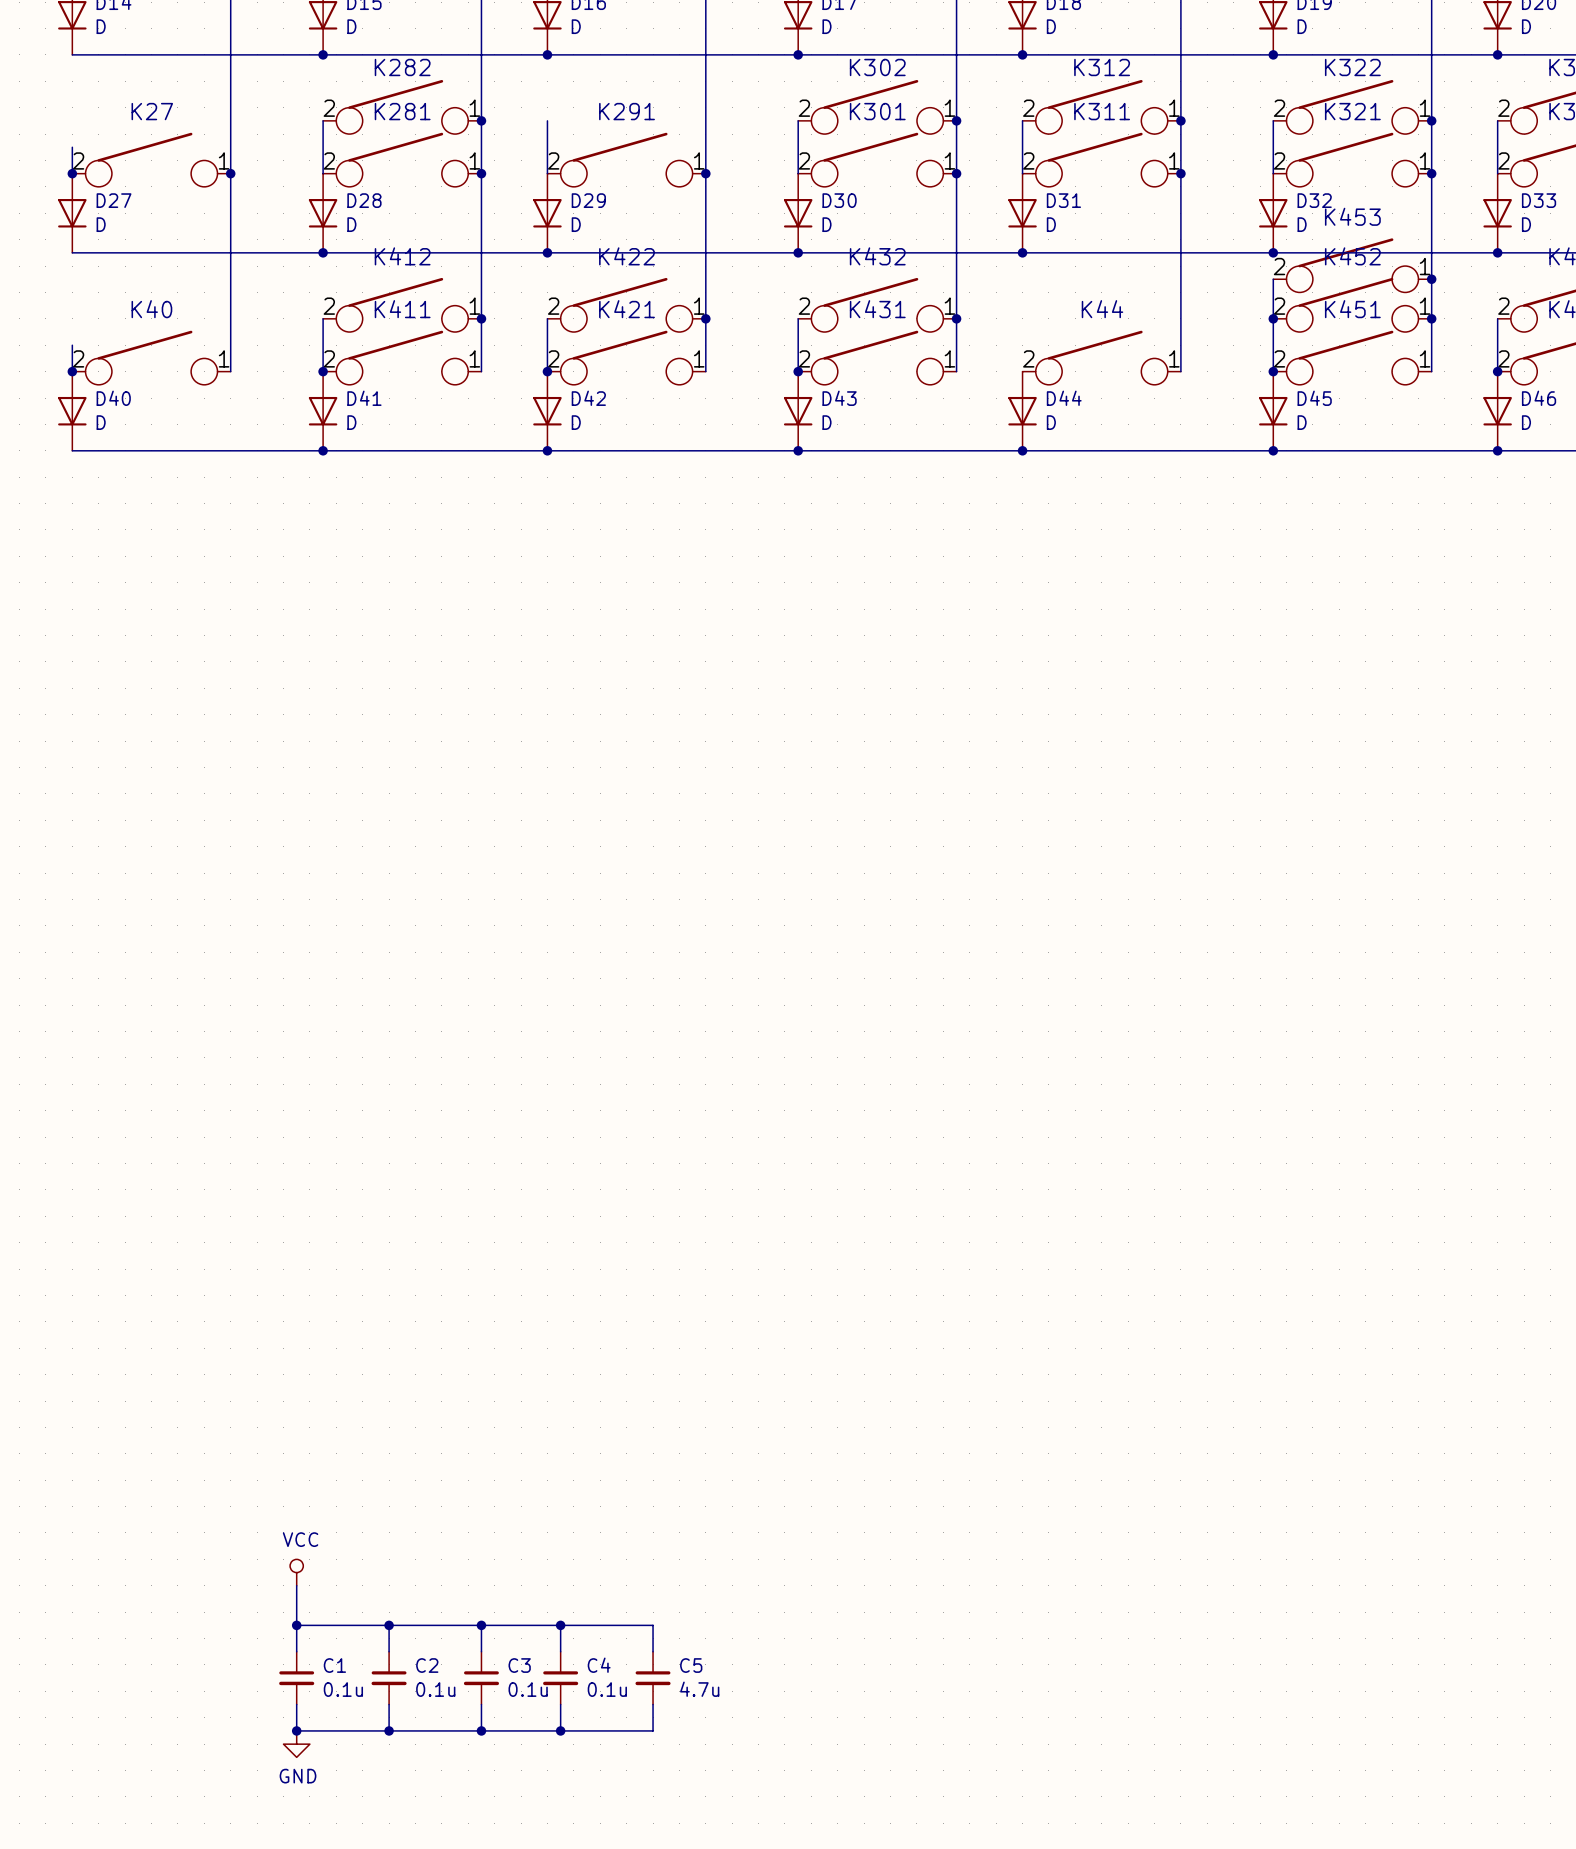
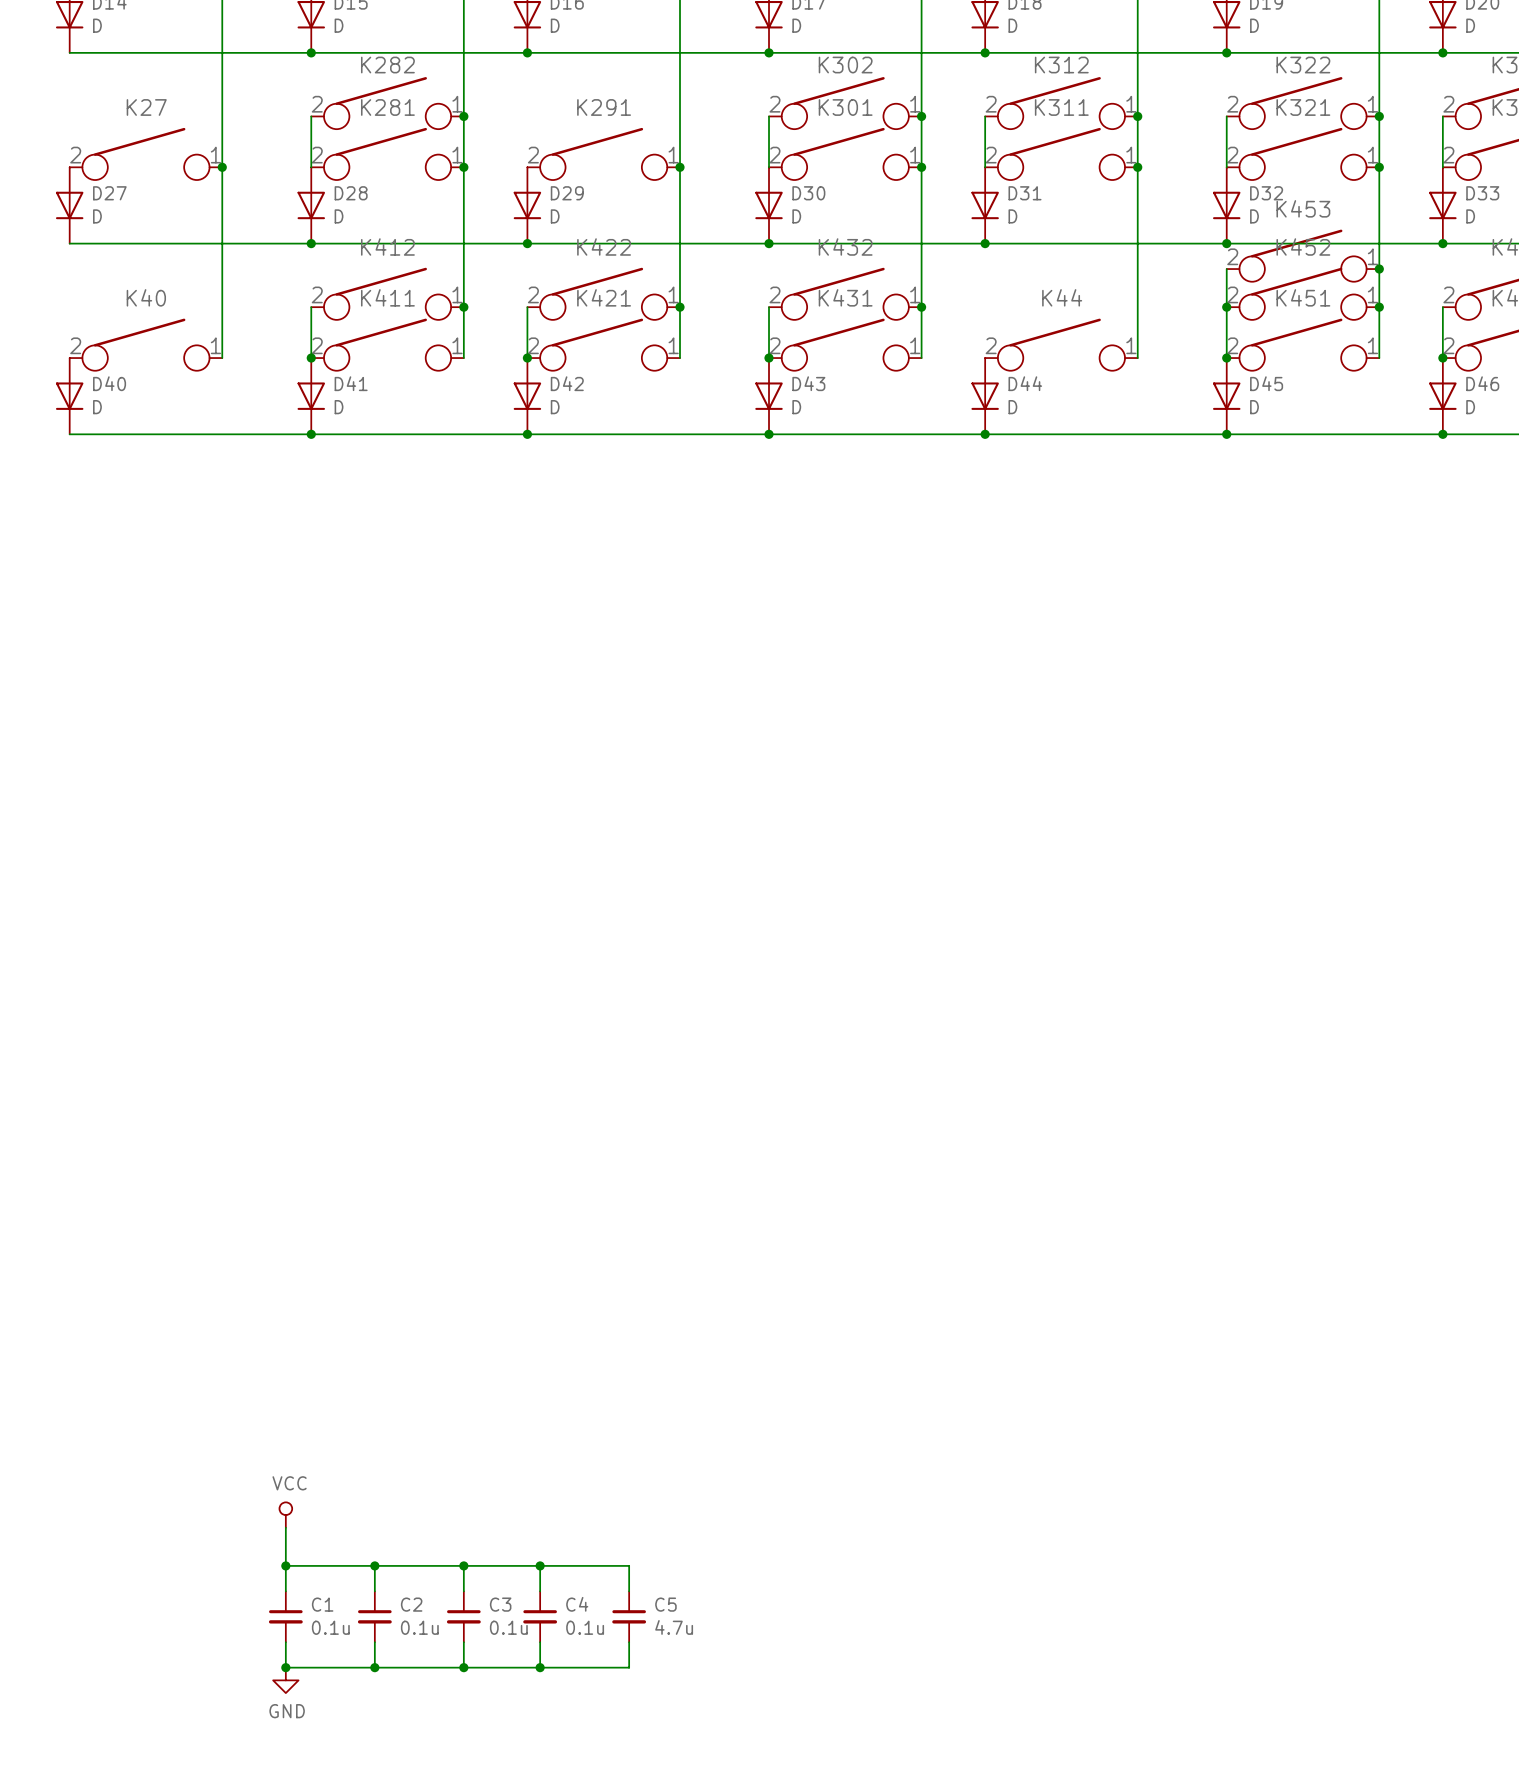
wire: (547, 120) (547, 173) -> none
wire: (72, 147) (72, 173) -> none
junction: (72, 173) -> none
wire: (72, 345) (72, 371) -> none
junction: (72, 371) -> none

